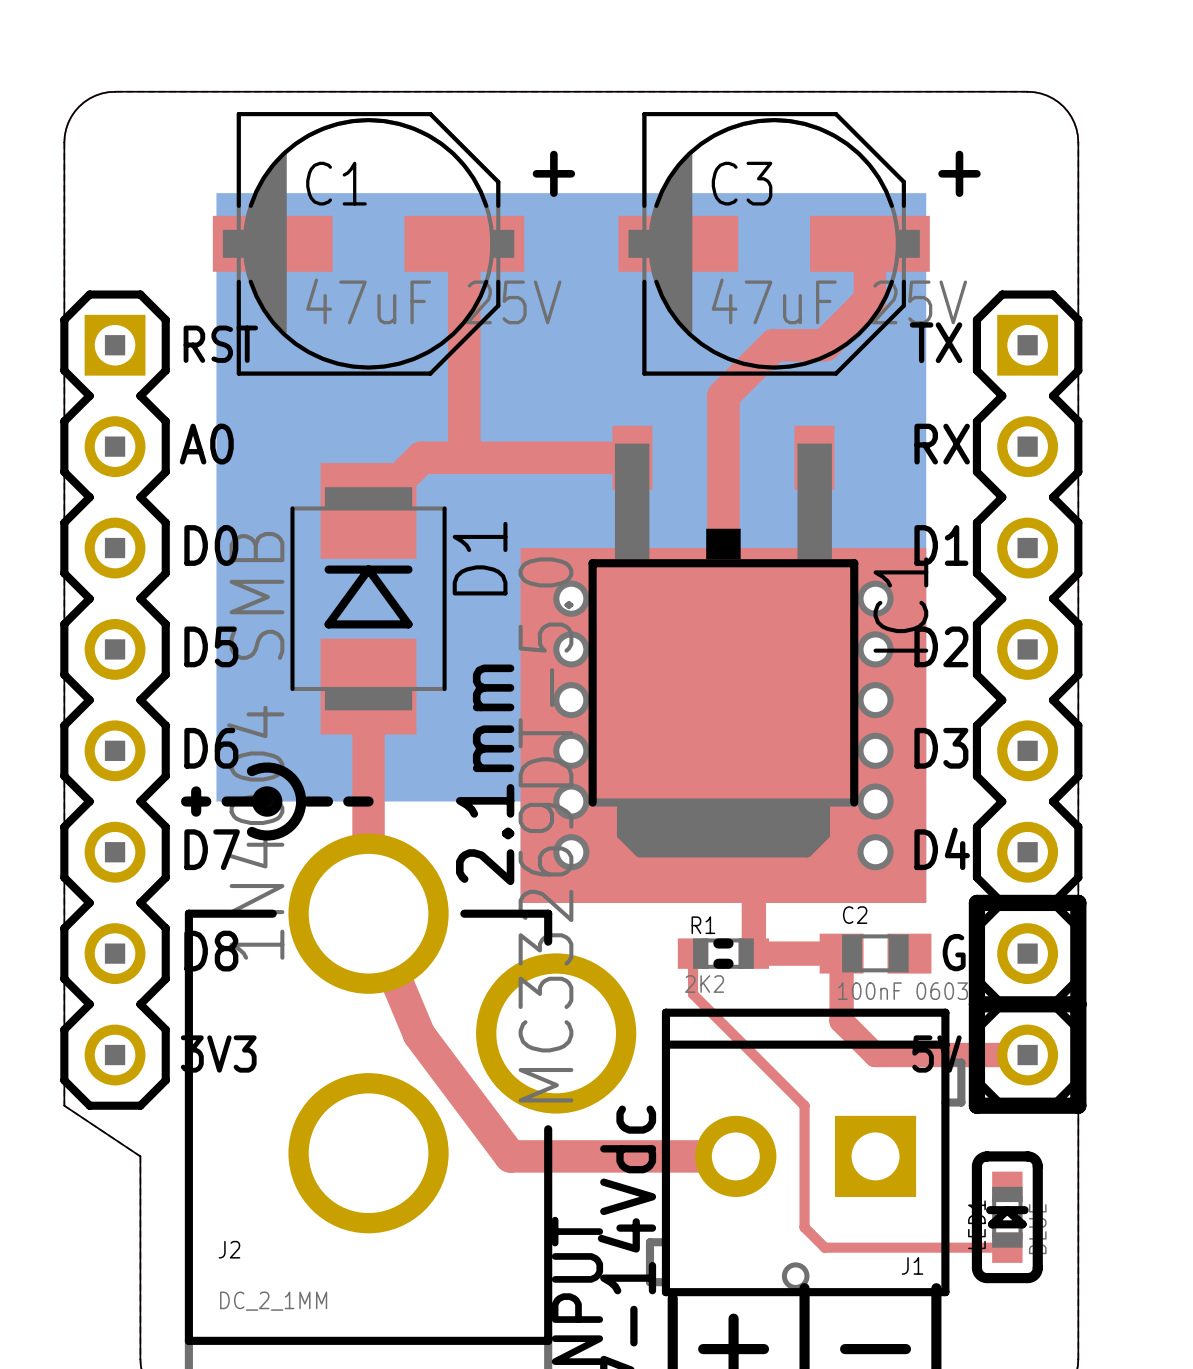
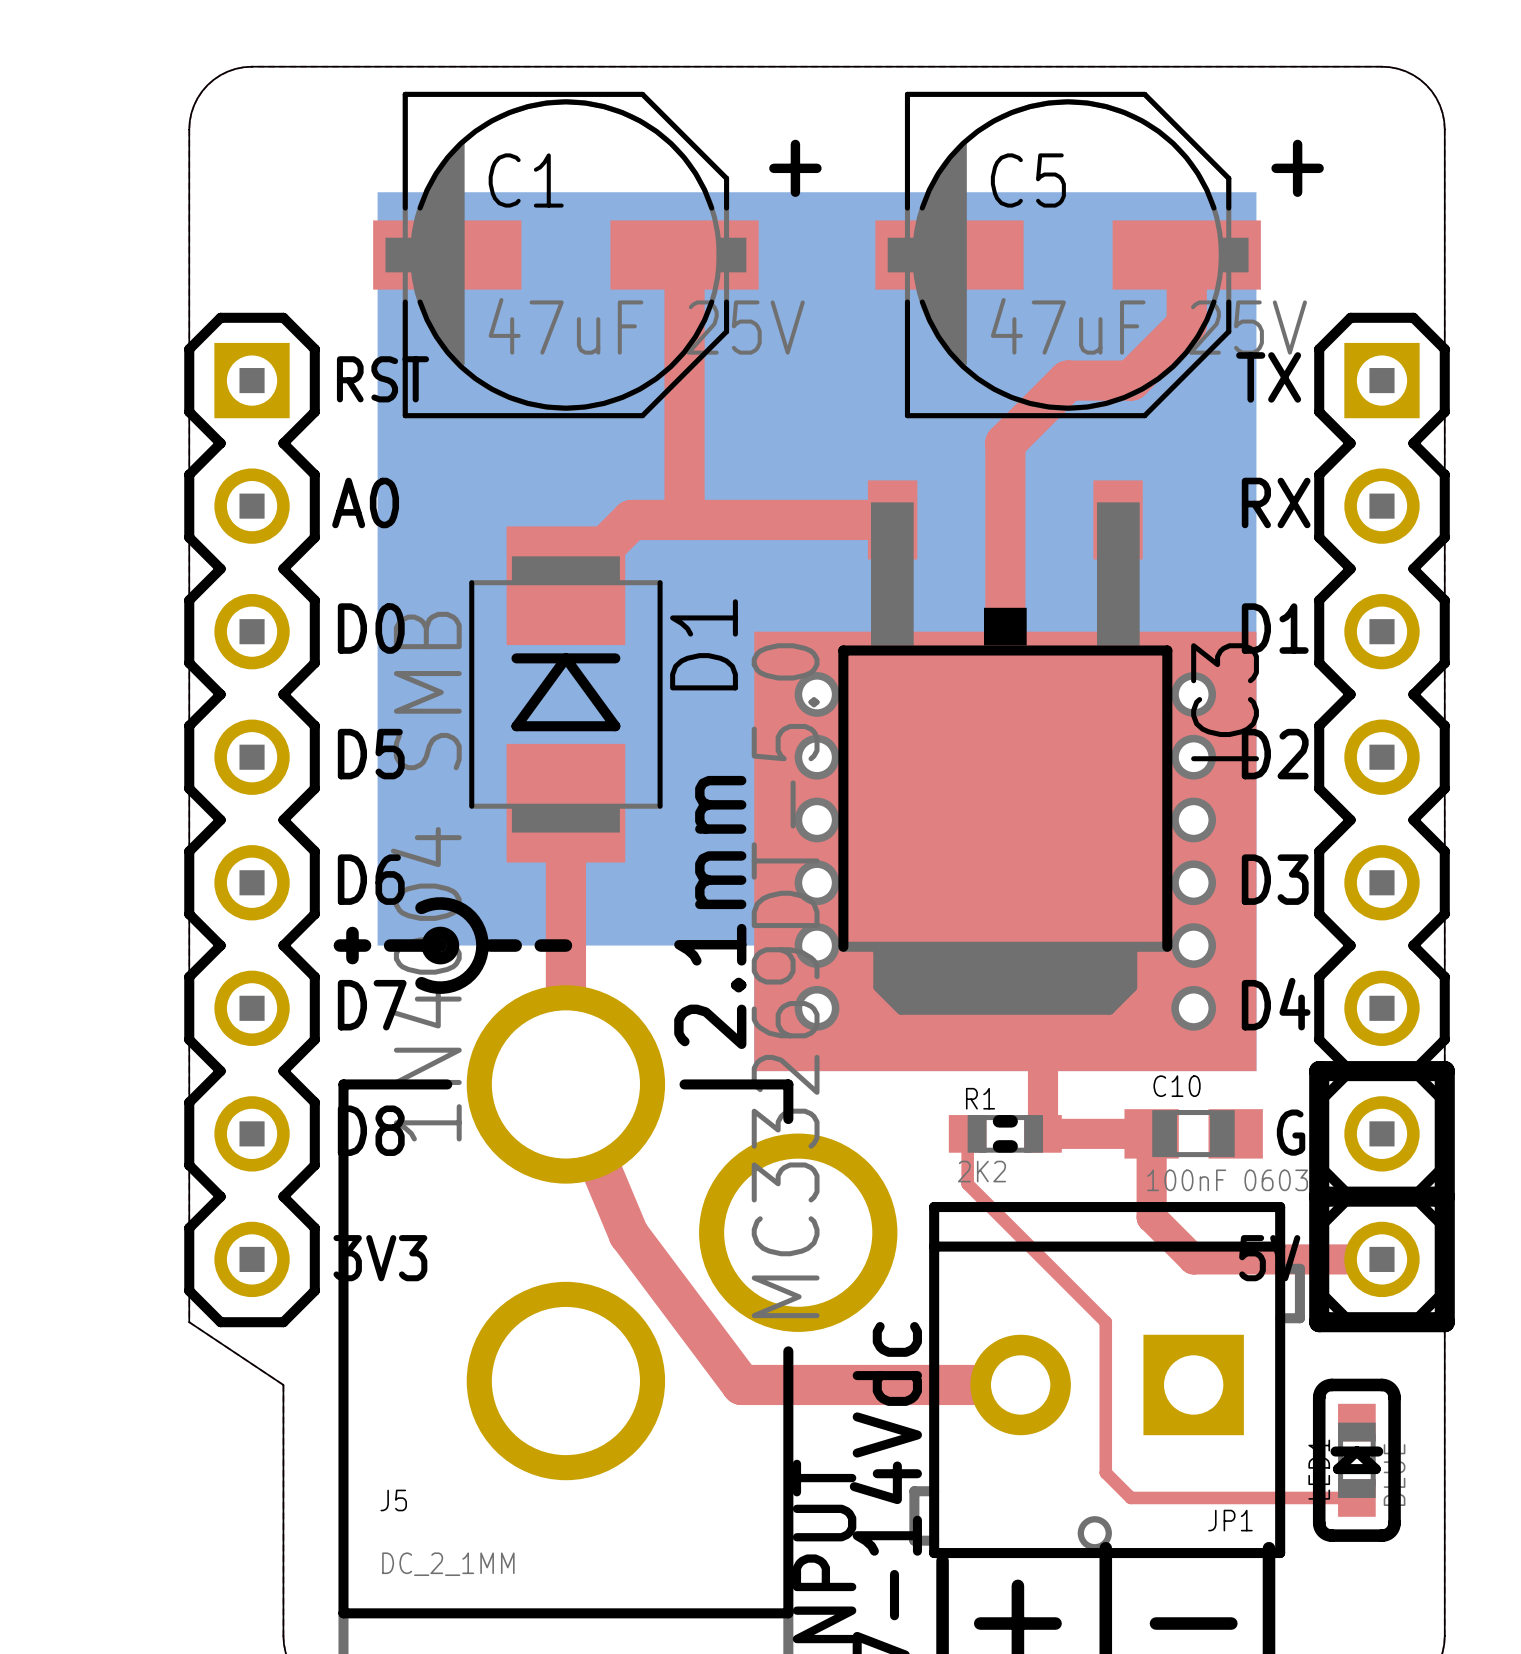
C3 name: C3 (742, 183) -> C5 (1028, 180)
IC1 name: IC1 (900, 605) -> IC3 (1225, 702)
C2 name: C2 (855, 915) -> C10 (1177, 1086)
J2 name: J2 (229, 1249) -> J5 (393, 1500)
J1 name: J1 (912, 1265) -> JP1 (1230, 1520)

